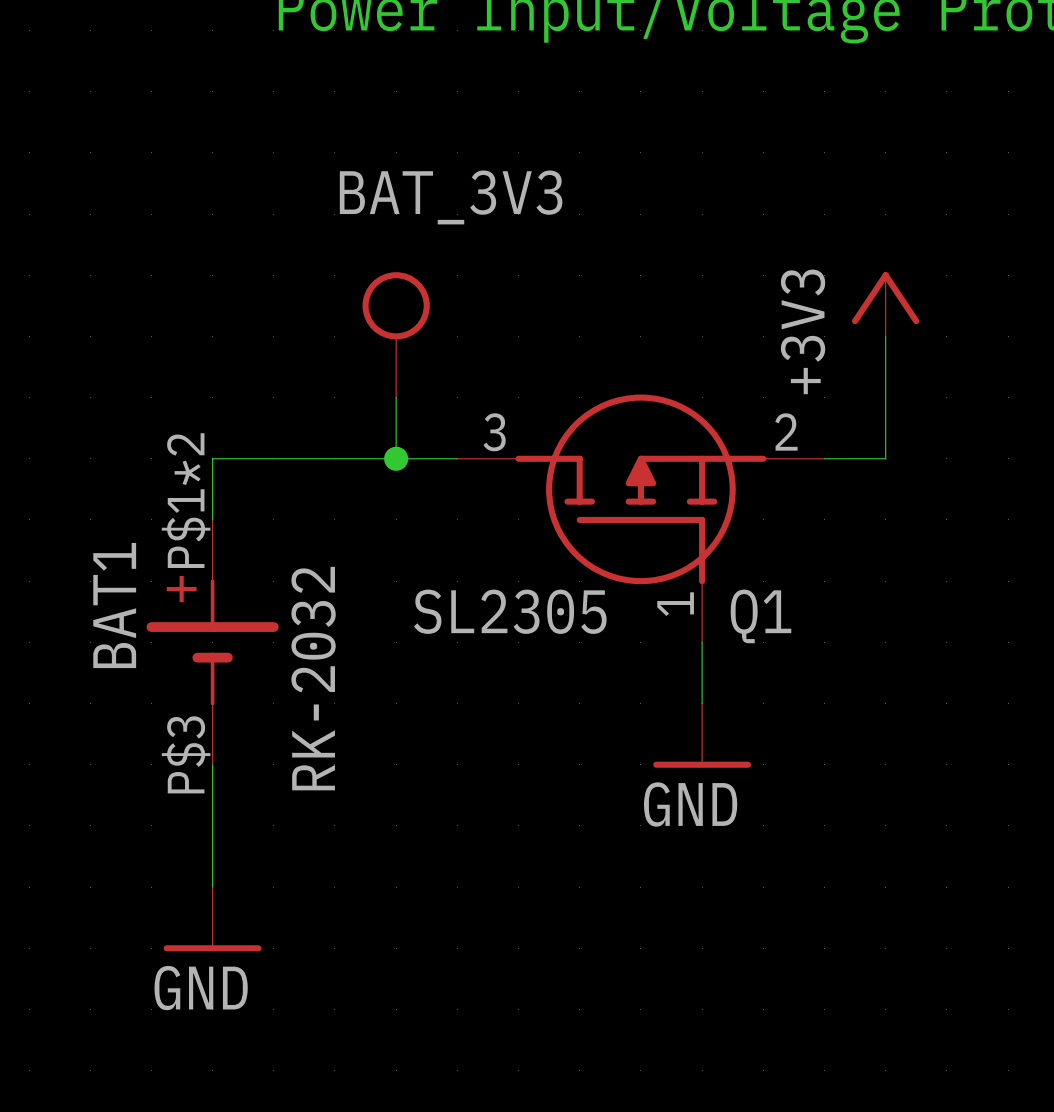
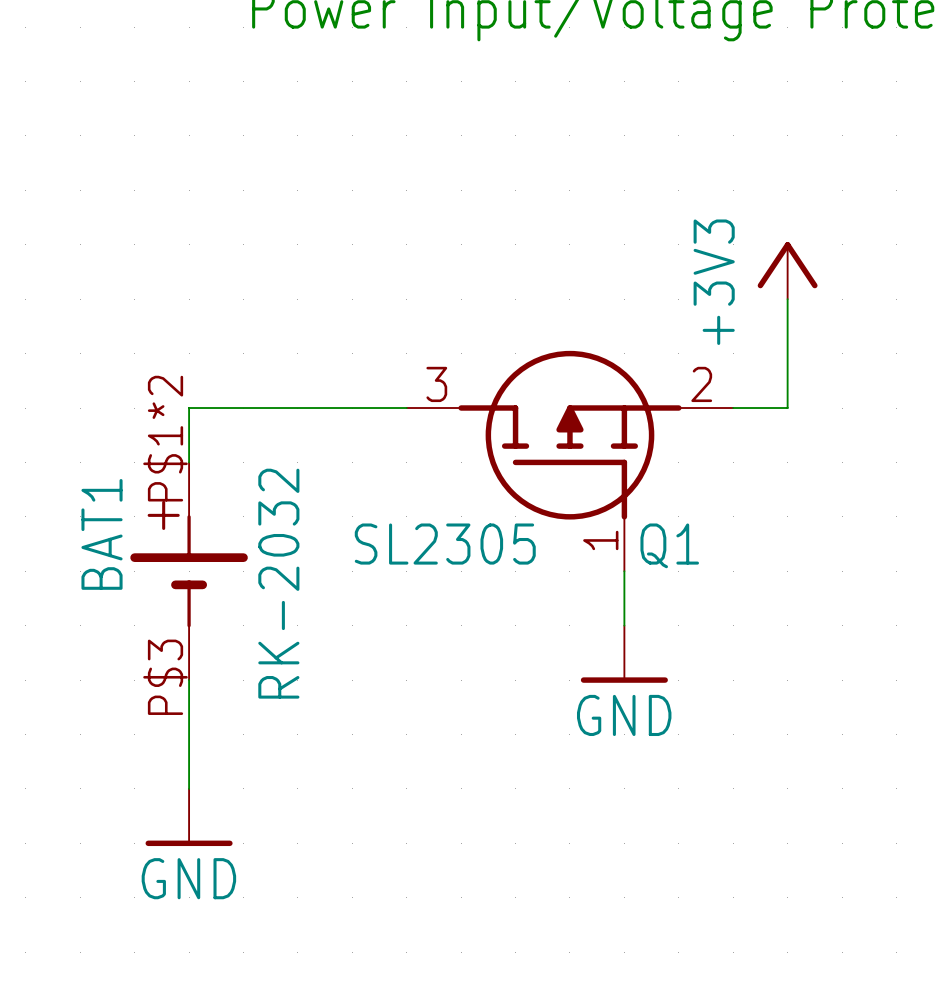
power symbol: (396, 334) -> none
wire: (396, 397) (396, 458) -> none
junction: (396, 458) -> none

